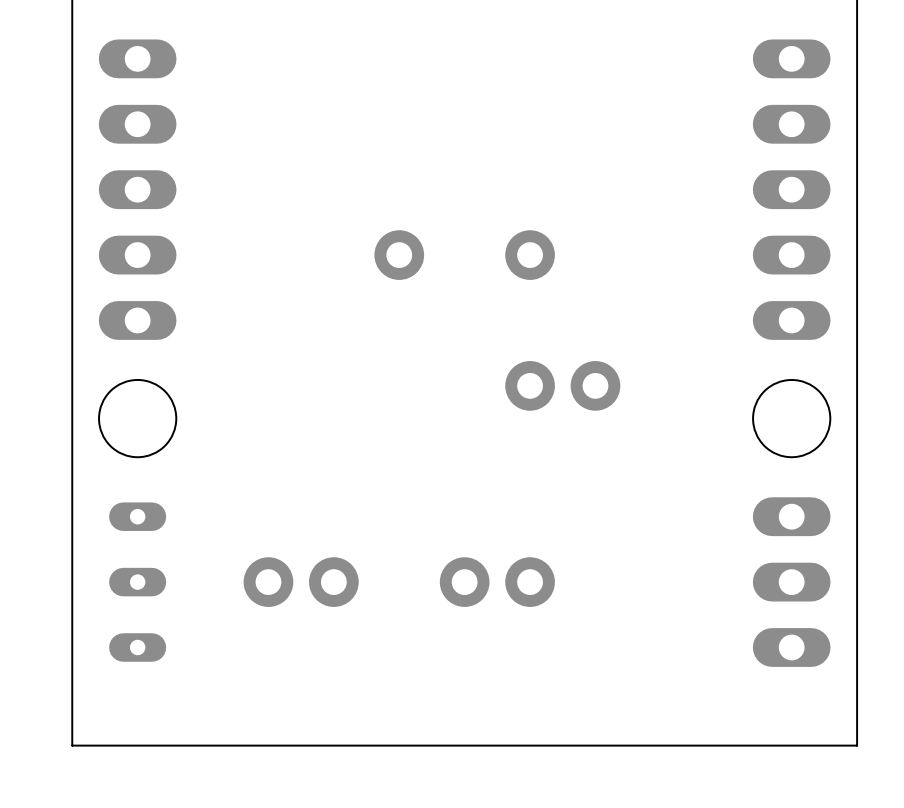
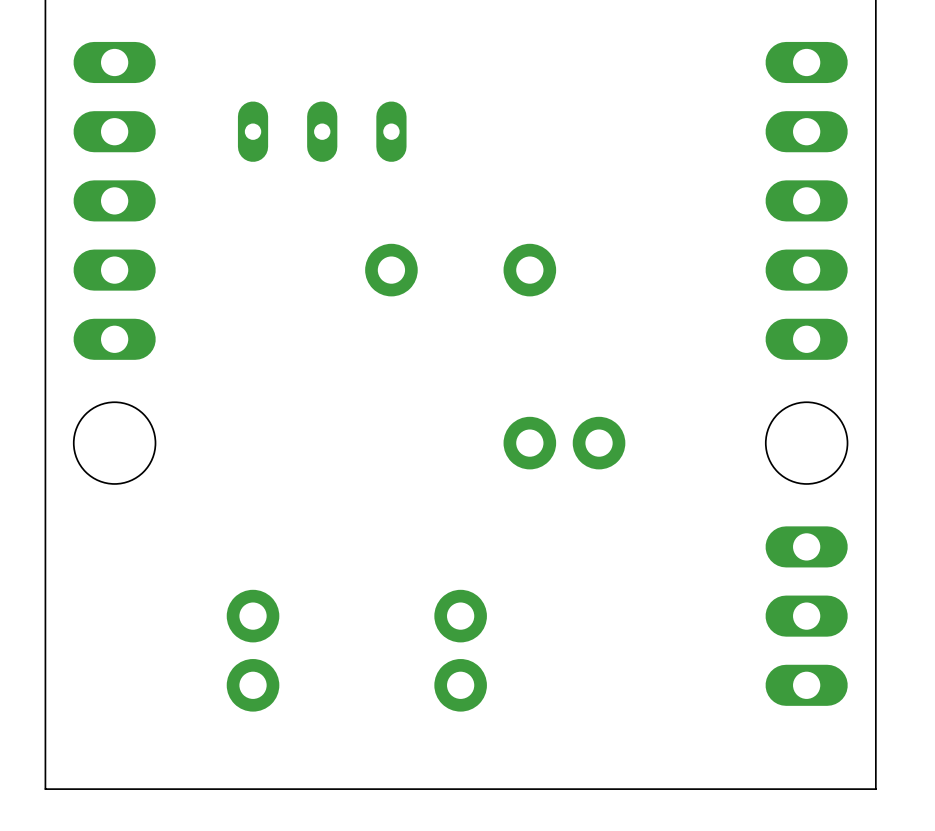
part position: (562, 385) -> (564, 443)
part rotation: 0° (137, 582) -> 90° clockwise (322, 131)
part position: (137, 582) -> (322, 131)
part rotation: 0° (301, 582) -> 90° clockwise (253, 650)
part rotation: 0° (497, 582) -> 90° clockwise (460, 650)

